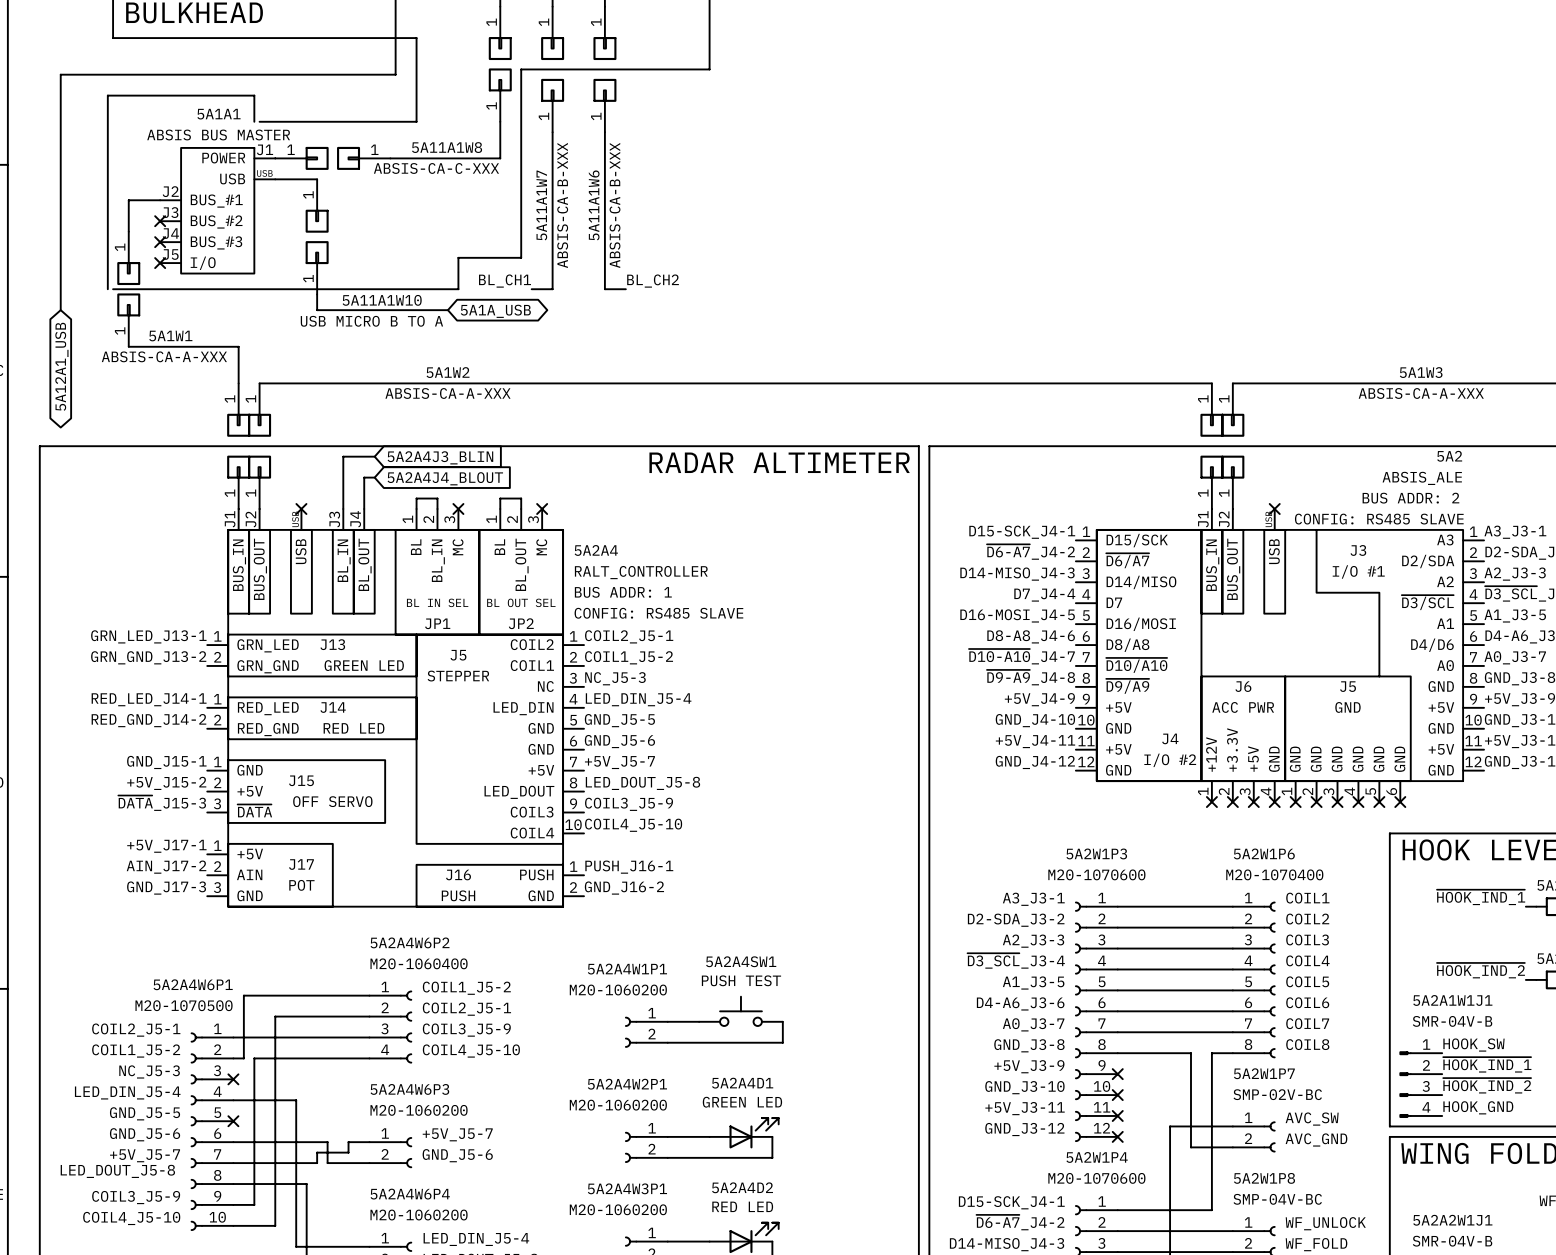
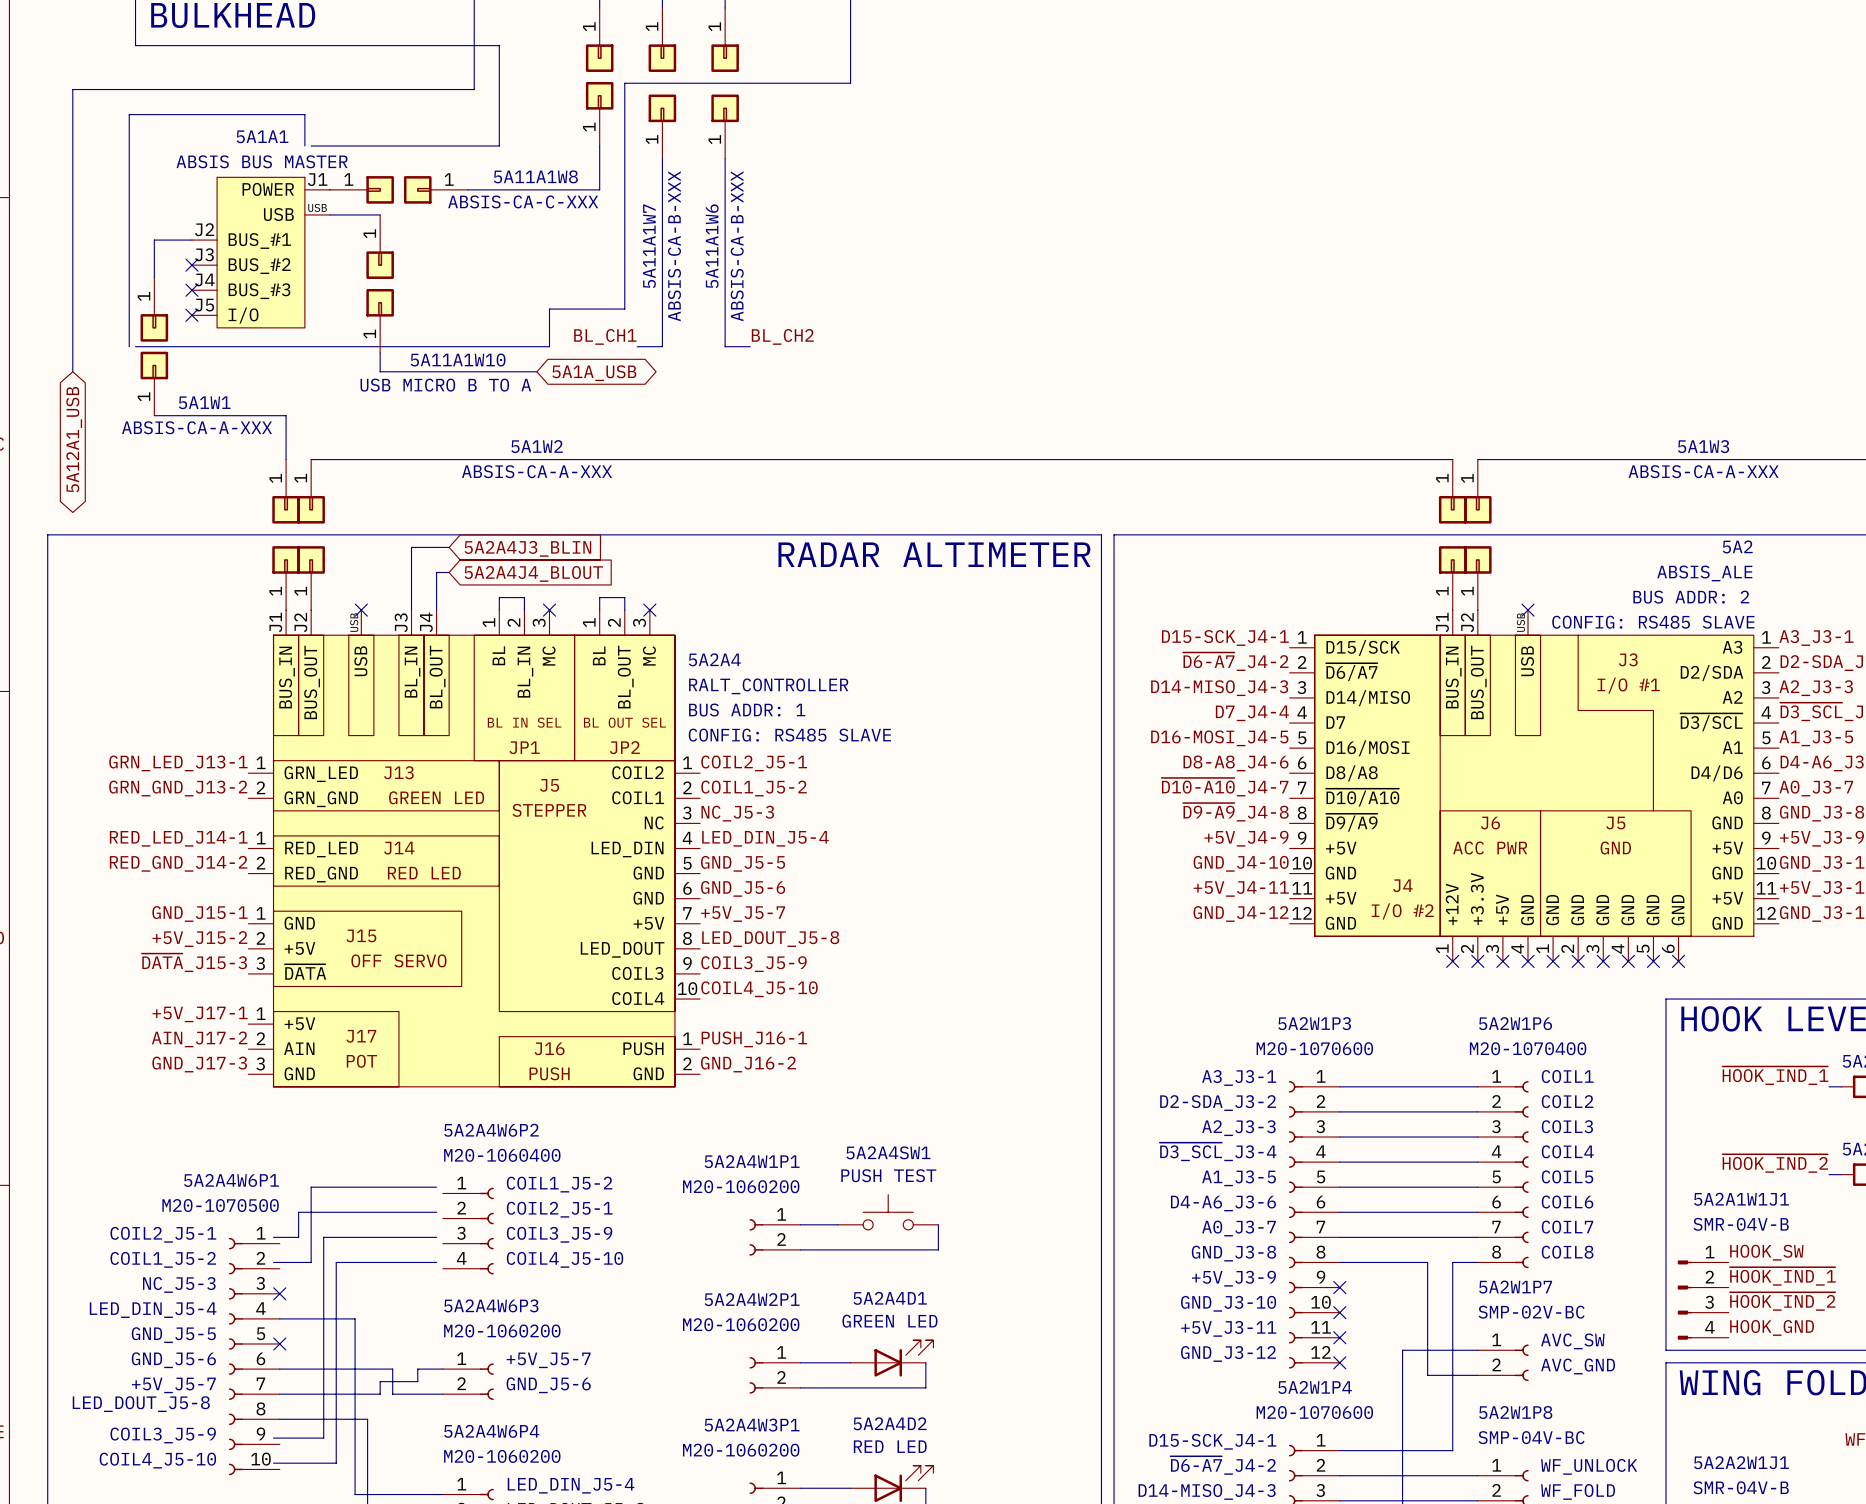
wire: none -> (436, 1187) (311, 1187) (311, 1262) (273, 1262)
wire: (369, 995) (243, 995) (243, 1058) (233, 1058) -> none
wire: none -> (436, 1212) (298, 1212) (298, 1237) (273, 1237)
wire: (369, 1016) (275, 1016) (275, 1225) (233, 1225) -> none
wire: none -> (436, 1237) (323, 1237) (323, 1438) (273, 1438)
wire: (233, 1037) (369, 1037) -> none
wire: none -> (436, 1262) (336, 1262) (336, 1463) (273, 1463)
wire: (369, 1058) (254, 1058) (254, 1204) (233, 1204) -> none

